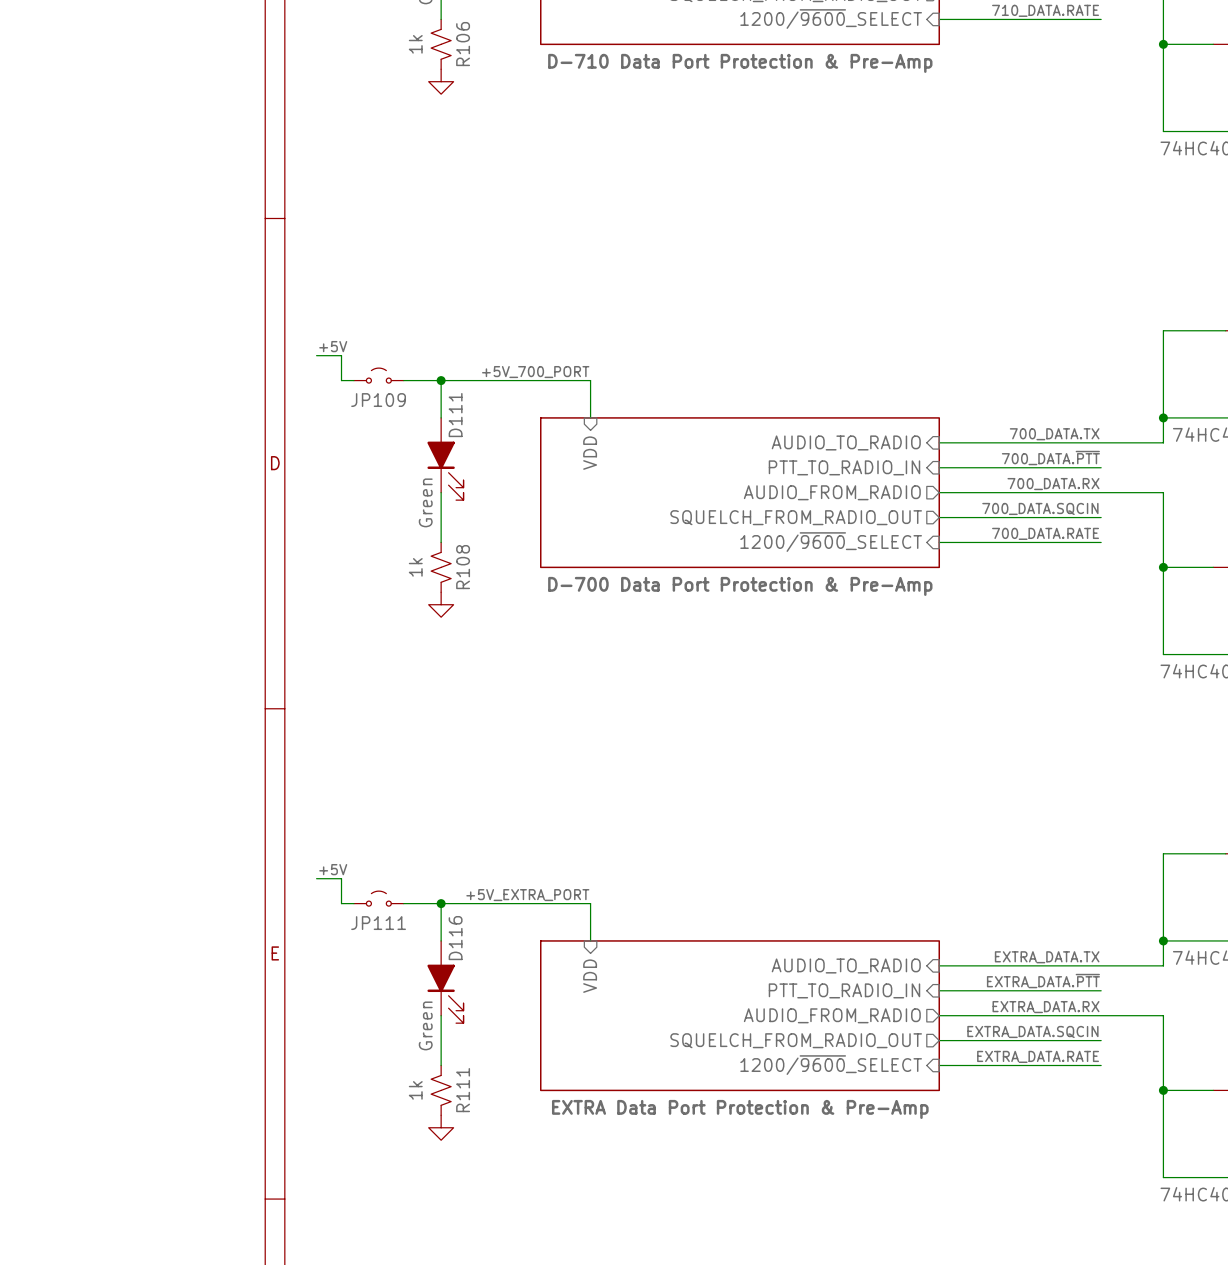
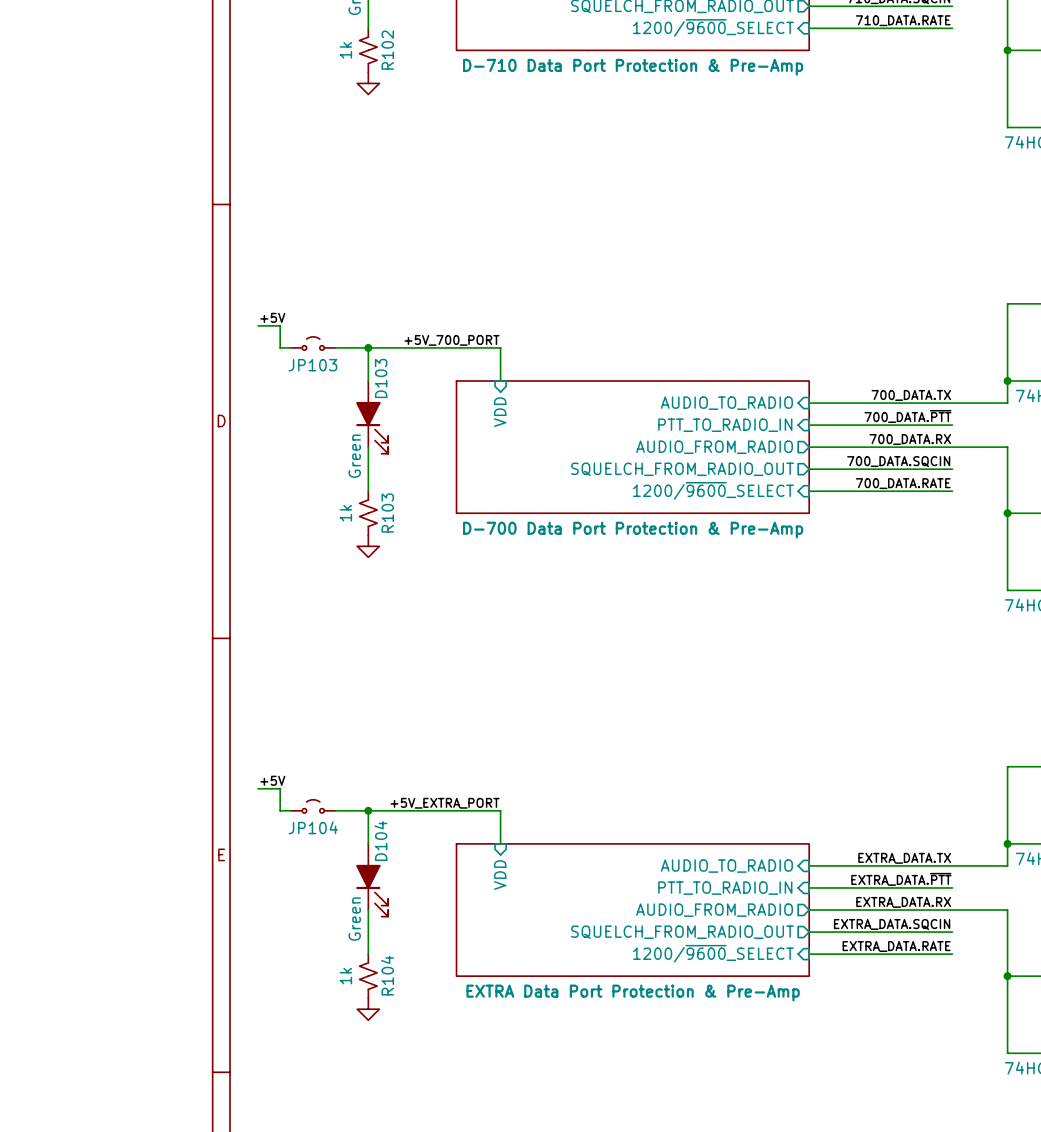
R106 name: R106 (463, 44) -> R102 (387, 50)
JP109 name: JP109 (378, 400) -> JP103 (312, 365)
D111 name: D111 (455, 415) -> D103 (381, 378)
R108 name: R108 (463, 567) -> R103 (387, 512)
JP111 name: JP111 (378, 923) -> JP104 (313, 827)
D116 name: D116 (455, 938) -> D104 (380, 841)
R111 name: R111 (463, 1090) -> R104 (387, 975)

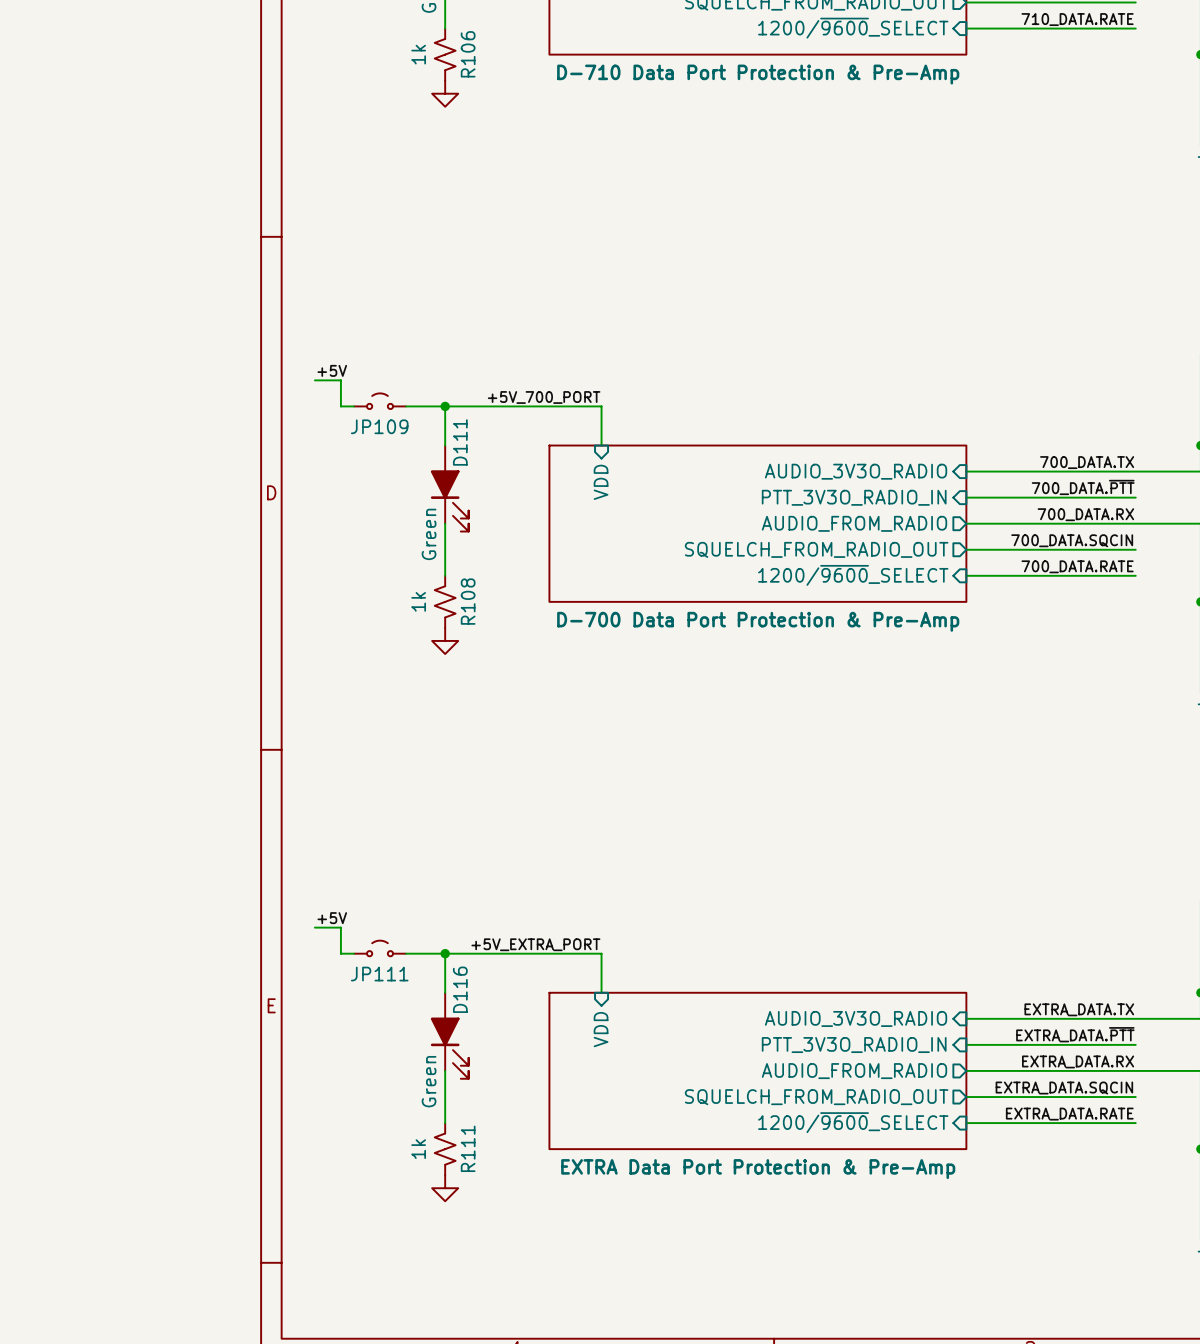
R102 name: R102 (387, 50) -> R106 (468, 54)
JP103 name: JP103 (312, 365) -> JP109 (379, 426)
D103 name: D103 (381, 378) -> D111 (460, 442)
sheet pin: AUDIO_TO_RADIO (726, 403) -> AUDIO_3V3O_RADIO (856, 471)
sheet pin: PTT_TO_RADIO_IN (725, 425) -> PTT_3V3O_RADIO_IN (854, 497)
R103 name: R103 (387, 512) -> R108 (468, 601)
JP104 name: JP104 (313, 827) -> JP111 (379, 974)
D104 name: D104 (380, 841) -> D116 (460, 989)
sheet pin: AUDIO_TO_RADIO (726, 866) -> AUDIO_3V3O_RADIO (856, 1018)
sheet pin: PTT_TO_RADIO_IN (725, 888) -> PTT_3V3O_RADIO_IN (854, 1045)
R104 name: R104 (387, 975) -> R111 (468, 1148)

